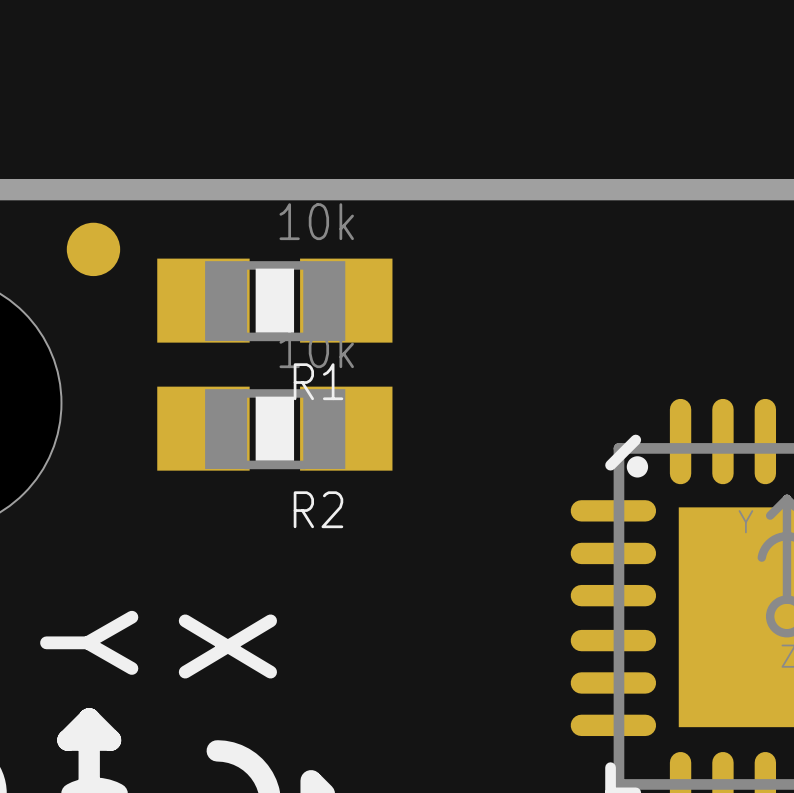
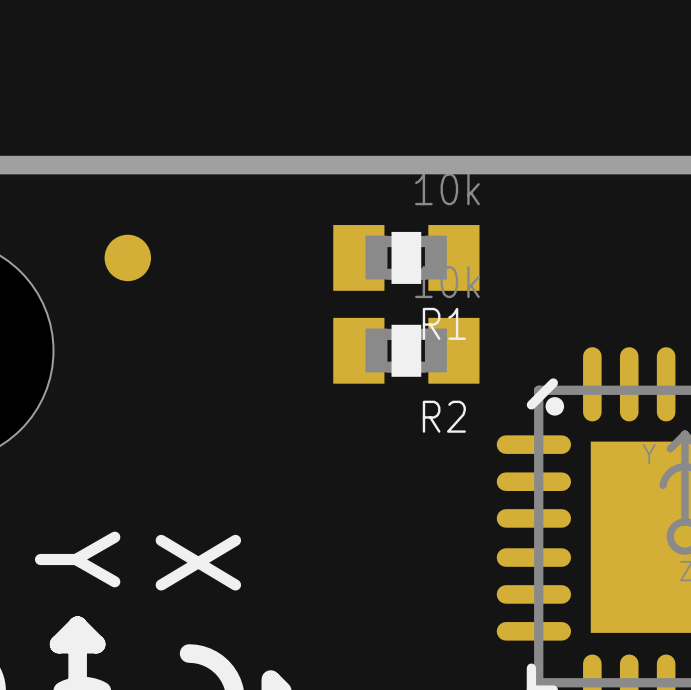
part position: (93, 249) -> (127, 257)
R1 footprint: [157, 258, 393, 343] -> [333, 225, 480, 291]
R2 footprint: [157, 386, 393, 471] -> [333, 317, 480, 384]

